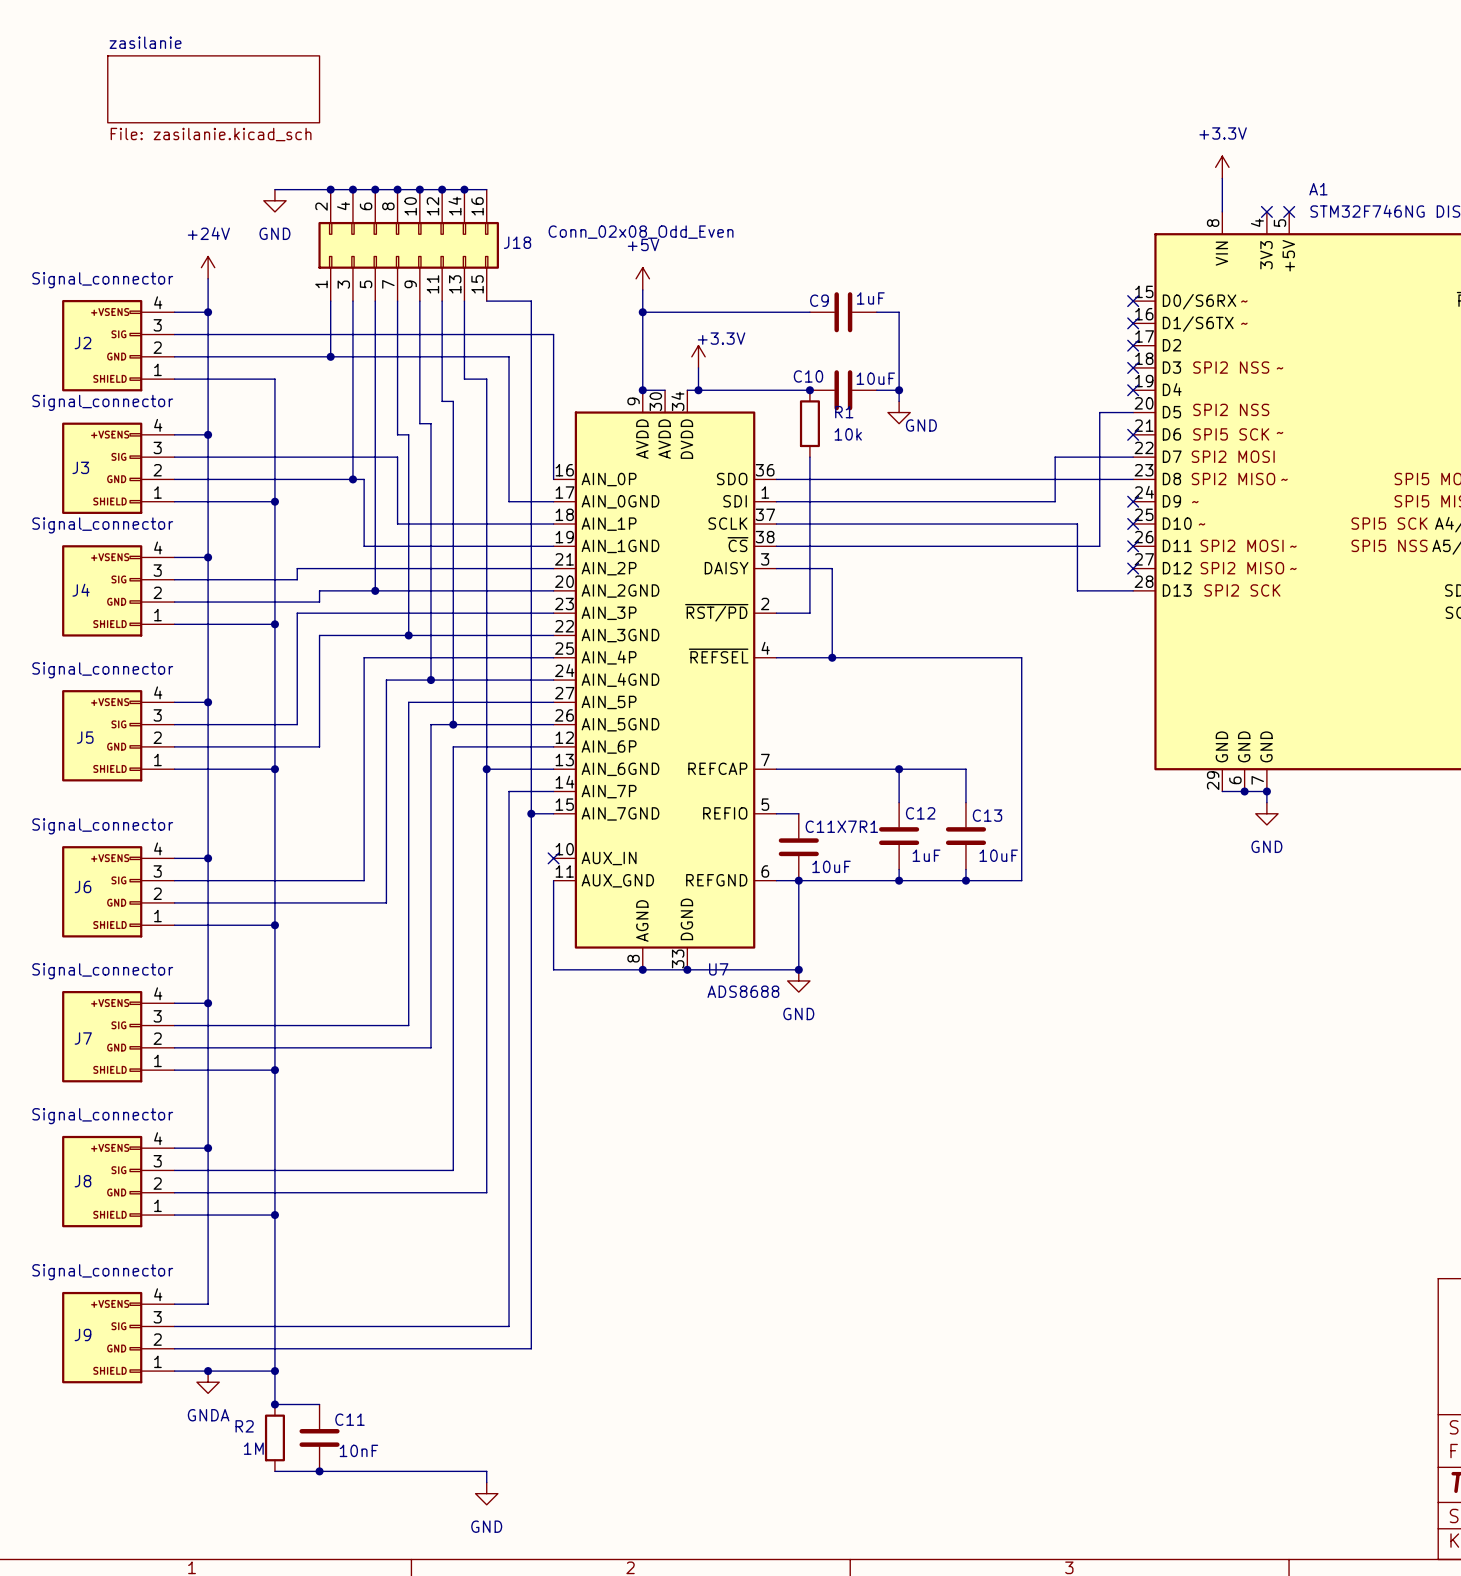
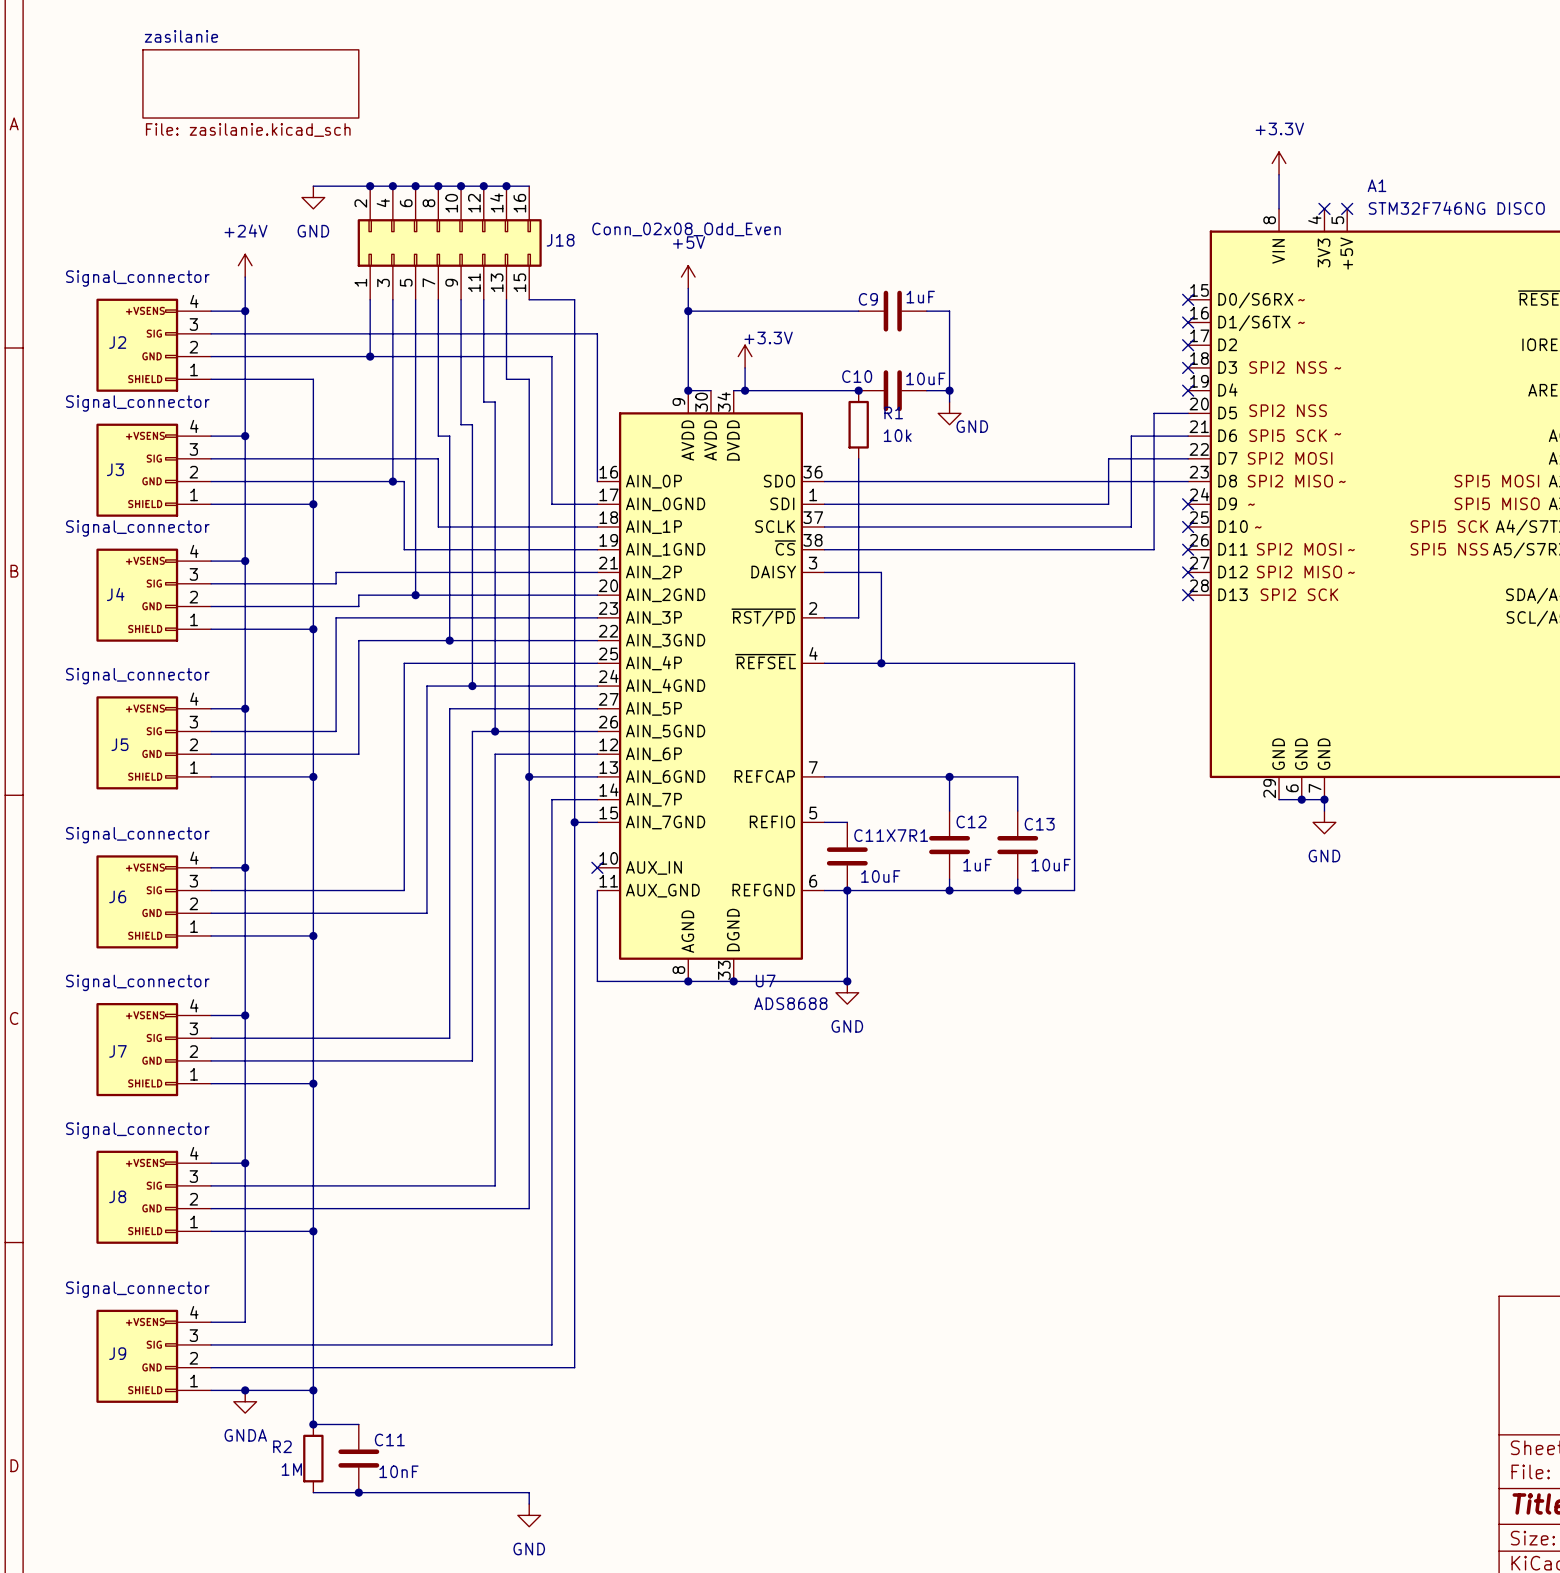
no-connect mark: (1133, 434) -> none
wire: (1077, 524) (1077, 590) (1133, 590) -> (1131, 526) (1131, 436) (1188, 436)
no-connect mark: none -> (1188, 595)

